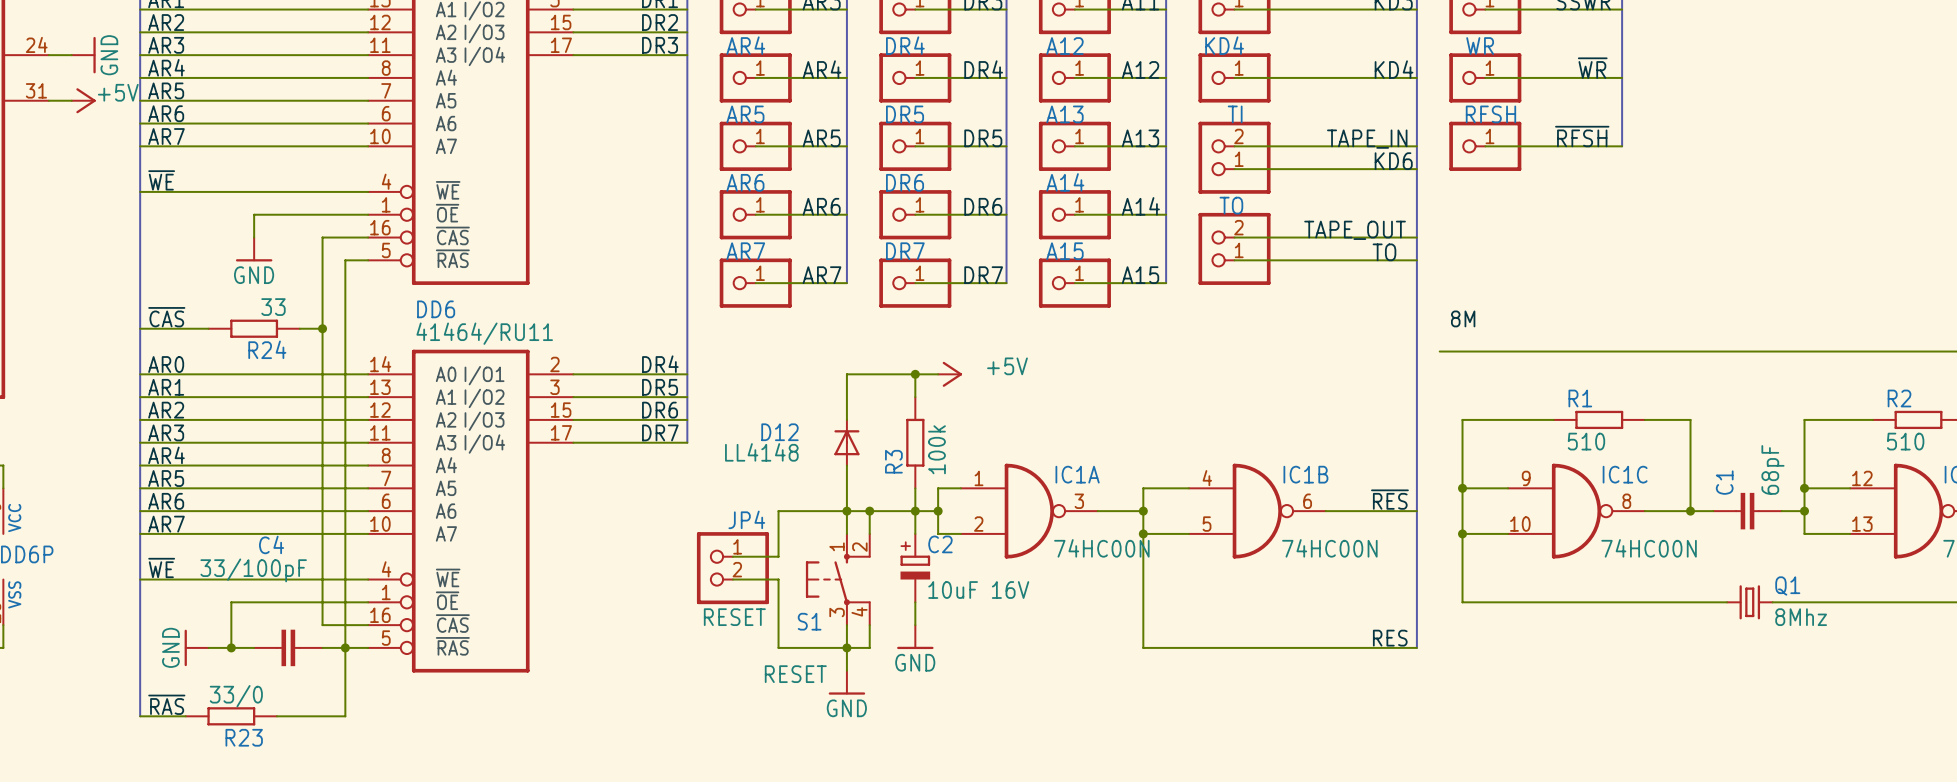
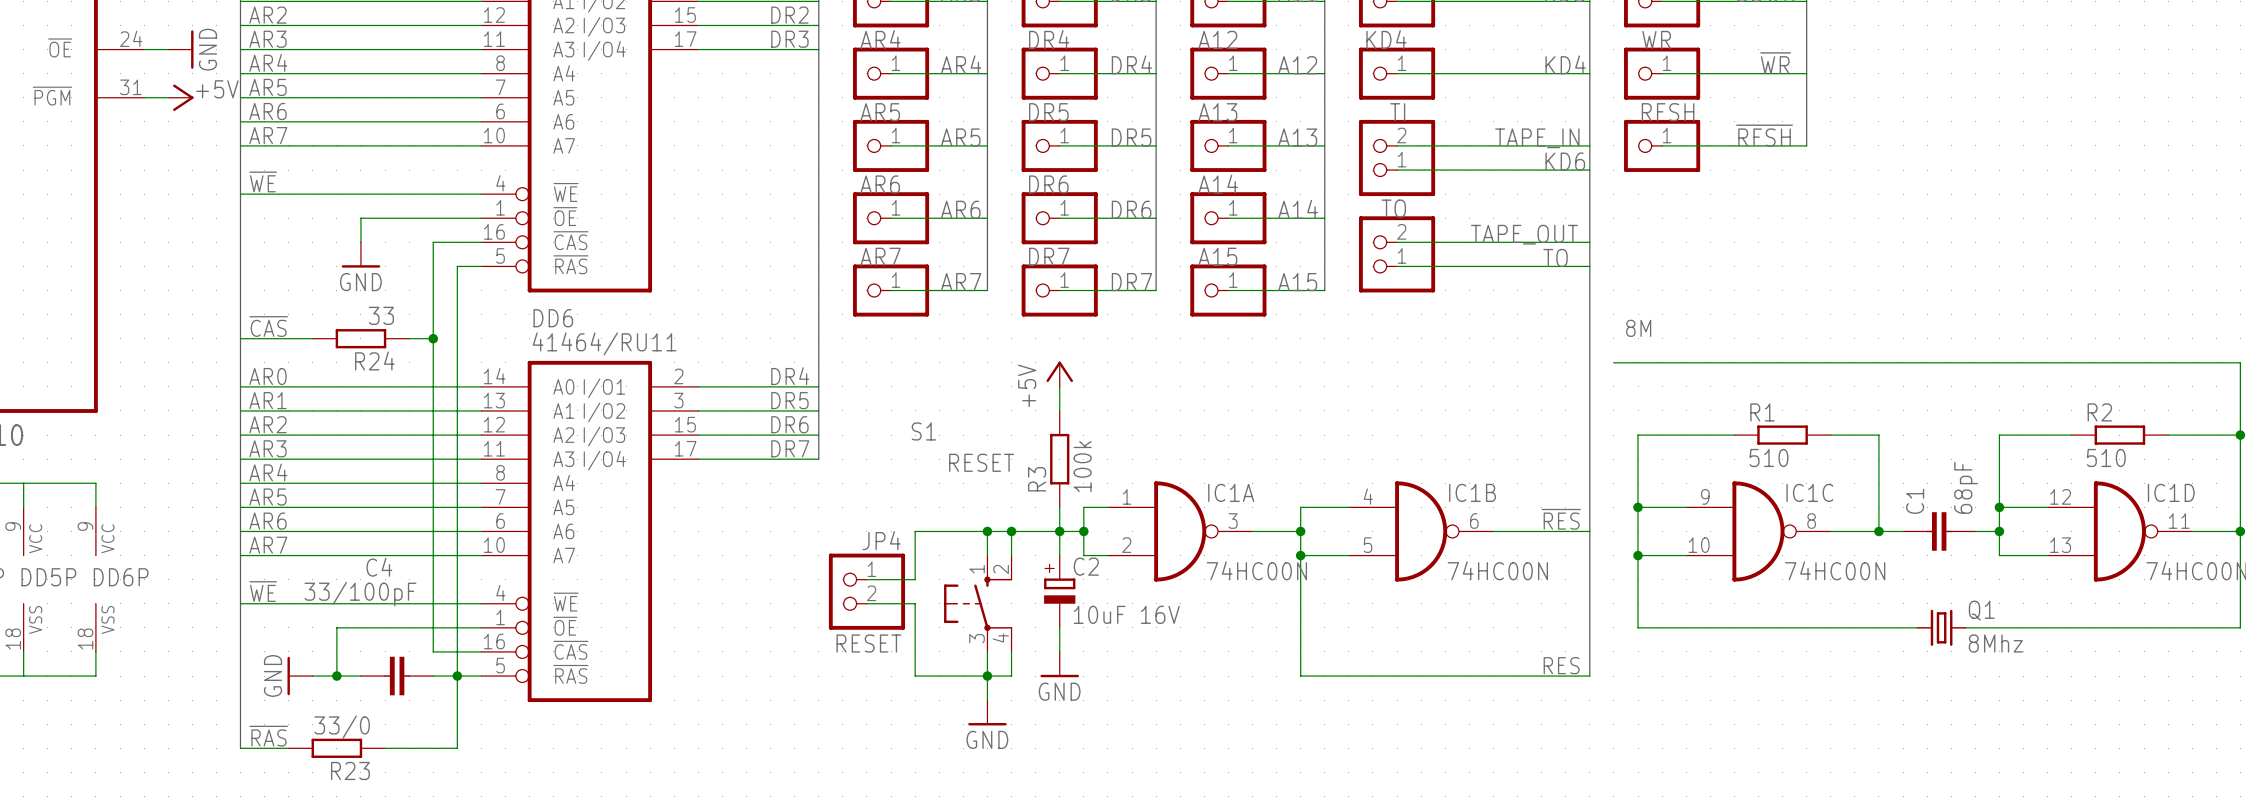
power symbol text position: +5V (1007, 366) -> +5V (1027, 385)
junction: (915, 374) -> none
wire: (938, 374) (846, 374) (846, 419) -> none
power symbol position: +5V (950, 374) -> +5V (1059, 374)
power symbol rotation: 0° (952, 374) -> 90° counterclockwise (1059, 371)
D12: LL4148 (846, 442) -> none
wire: (846, 465) (846, 511) -> none
S1 name position: S1 (809, 621) -> S1 (923, 431)
S1 value position: RESET (795, 674) -> RESET (981, 462)

